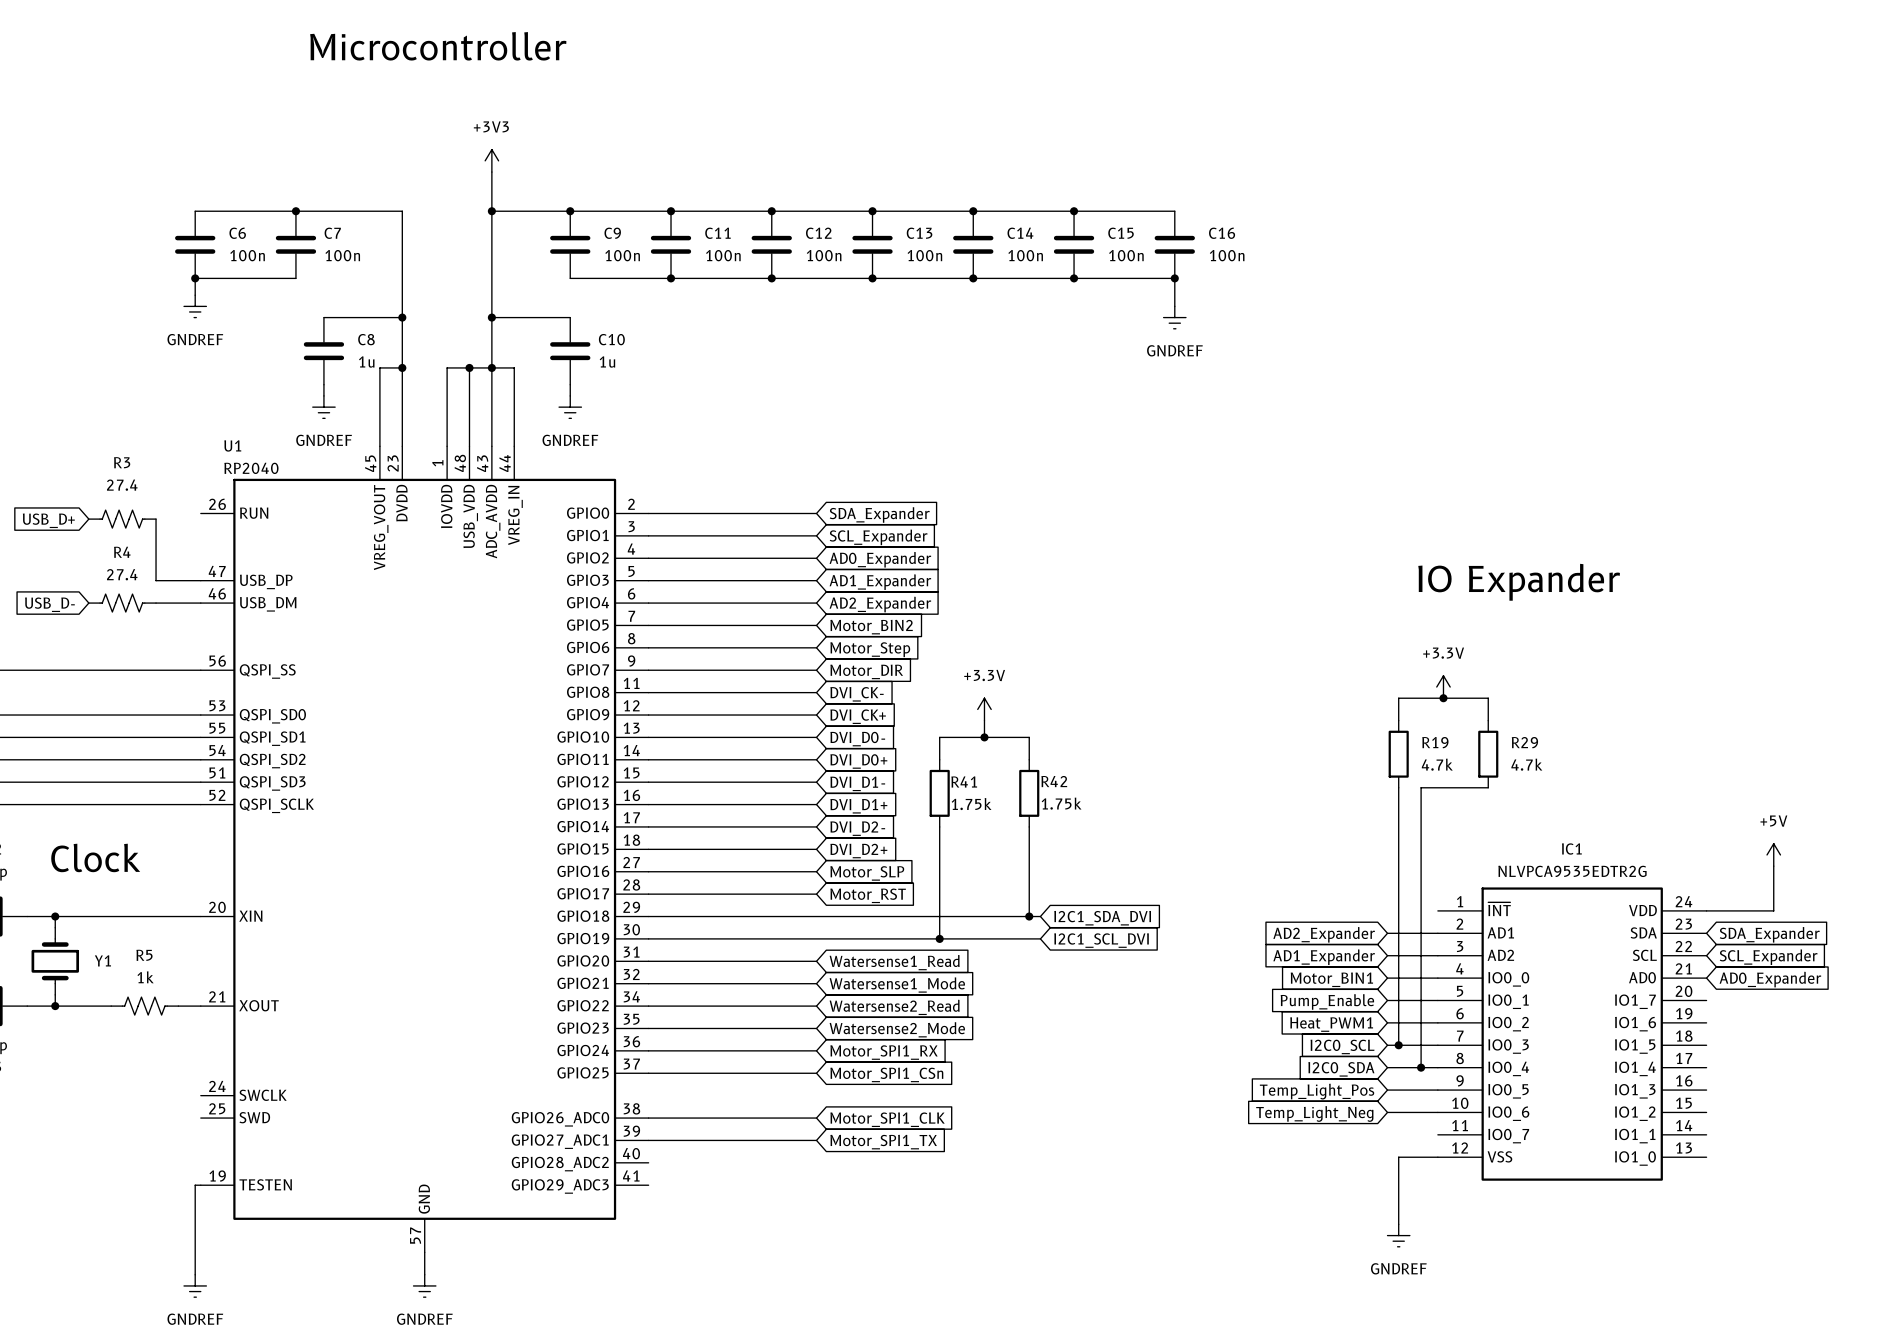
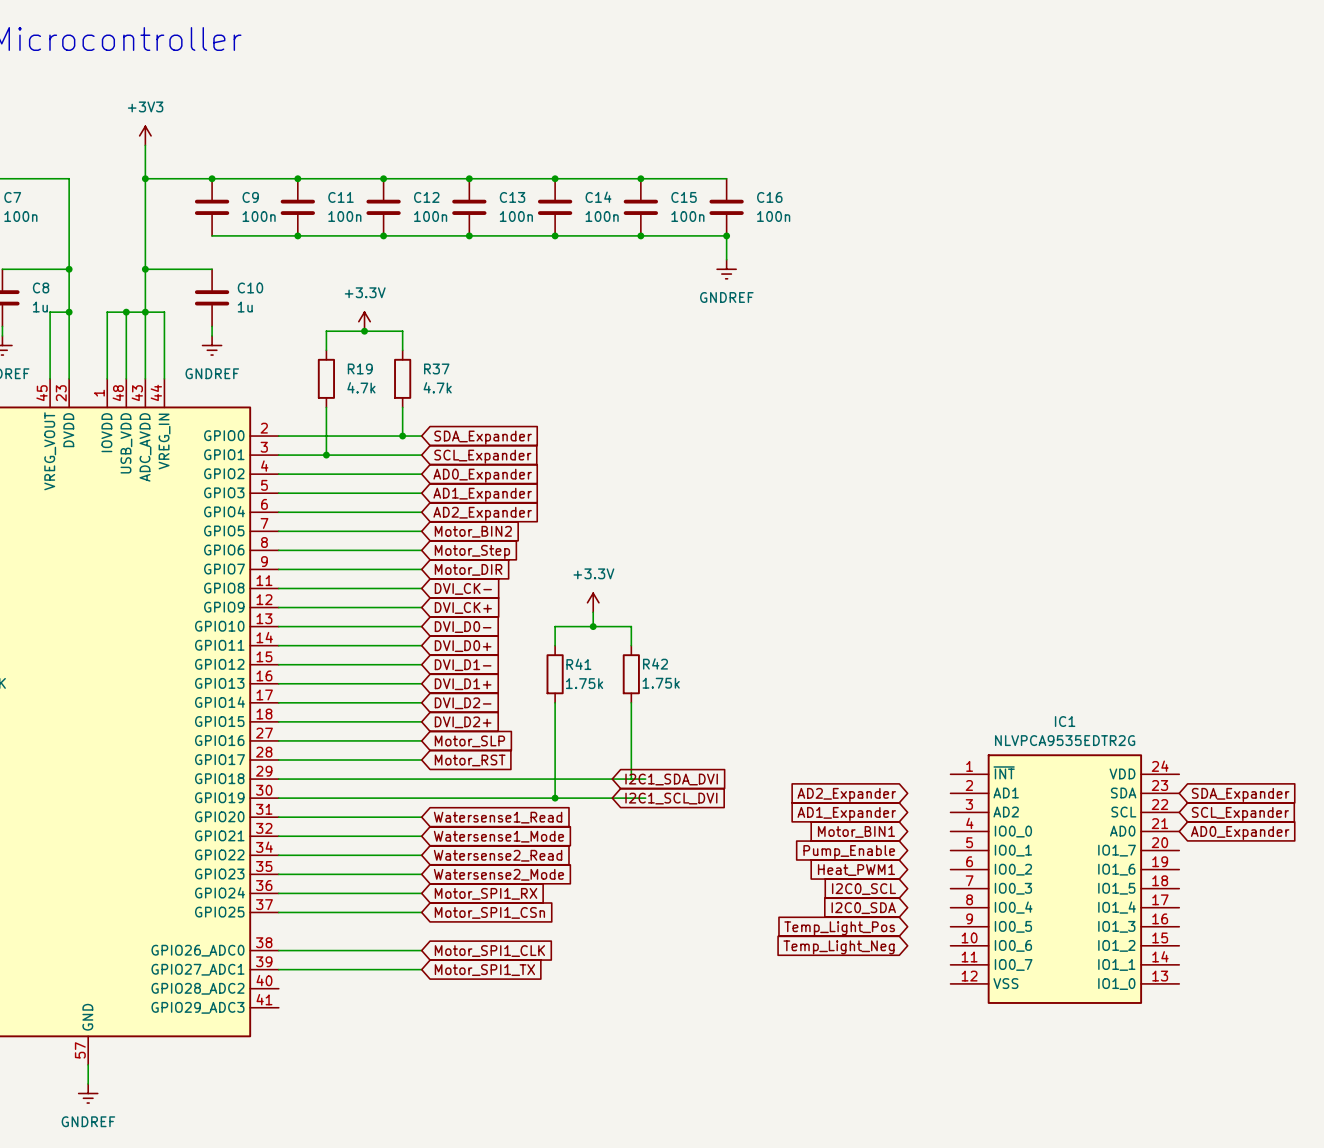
power symbol: none -> +3.3V (364, 321)
junction: none -> (364, 331)
wire: none -> (326, 350) (326, 331) (402, 331) (402, 350)
R37: none -> 4.7k (402, 378)
wire: none -> (326, 407) (326, 455)
wire: none -> (402, 407) (402, 436)
junction: none -> (402, 436)
junction: none -> (326, 455)
text: IO Expander (1519, 582) -> none
power symbol: +3.3V (1443, 687) -> none
junction: (1443, 698) -> none
power symbol position: +3.3V (984, 709) -> +3.3V (593, 602)
wire: (984, 720) (984, 737) -> (593, 612) (593, 626)
wire: (1398, 720) (1398, 698) (1488, 698) (1488, 720) -> none
wire: (973, 737) (939, 737) (939, 759) -> (555, 626) (555, 645)
junction position: (984, 737) -> (593, 626)
wire: (1029, 737) (1029, 759) -> (602, 626) (631, 626) (631, 645)
R19 position: (1398, 754) -> (326, 378)
R29: 4.7k (1488, 754) -> none
wire: (1398, 787) (1398, 1045) -> none
wire: (1488, 787) (1421, 787) (1421, 1067) -> none
R41 position: (939, 793) -> (555, 674)
R42 position: (1029, 793) -> (631, 674)
wire: (939, 826) (939, 938) -> (555, 702) (555, 798)
wire: (1029, 826) (1029, 916) -> (631, 702) (631, 779)
power symbol: +5V (1773, 854) -> none
wire: (1773, 866) (1773, 910) (1706, 910) -> none
junction: (1029, 916) -> none
wire: none -> (612, 779) (645, 779)
wire: (1387, 933) (1437, 933) -> none
junction: (939, 938) -> none
junction: none -> (555, 798)
wire: none -> (612, 798) (645, 798)
wire: (1387, 955) (1437, 955) -> none
wire: (1387, 978) (1437, 978) -> none
wire: (1387, 1000) (1437, 1000) -> none
wire: (1387, 1022) (1437, 1022) -> none
wire: (1387, 1045) (1437, 1045) -> none
junction: (1398, 1045) -> none
wire: (1387, 1067) (1437, 1067) -> none
junction: (1421, 1067) -> none
wire: (1387, 1090) (1437, 1090) -> none
wire: (1387, 1112) (1437, 1112) -> none
wire: (1437, 1157) (1398, 1157) (1398, 1224) -> none
power symbol: GNDREF (1398, 1235) -> none

